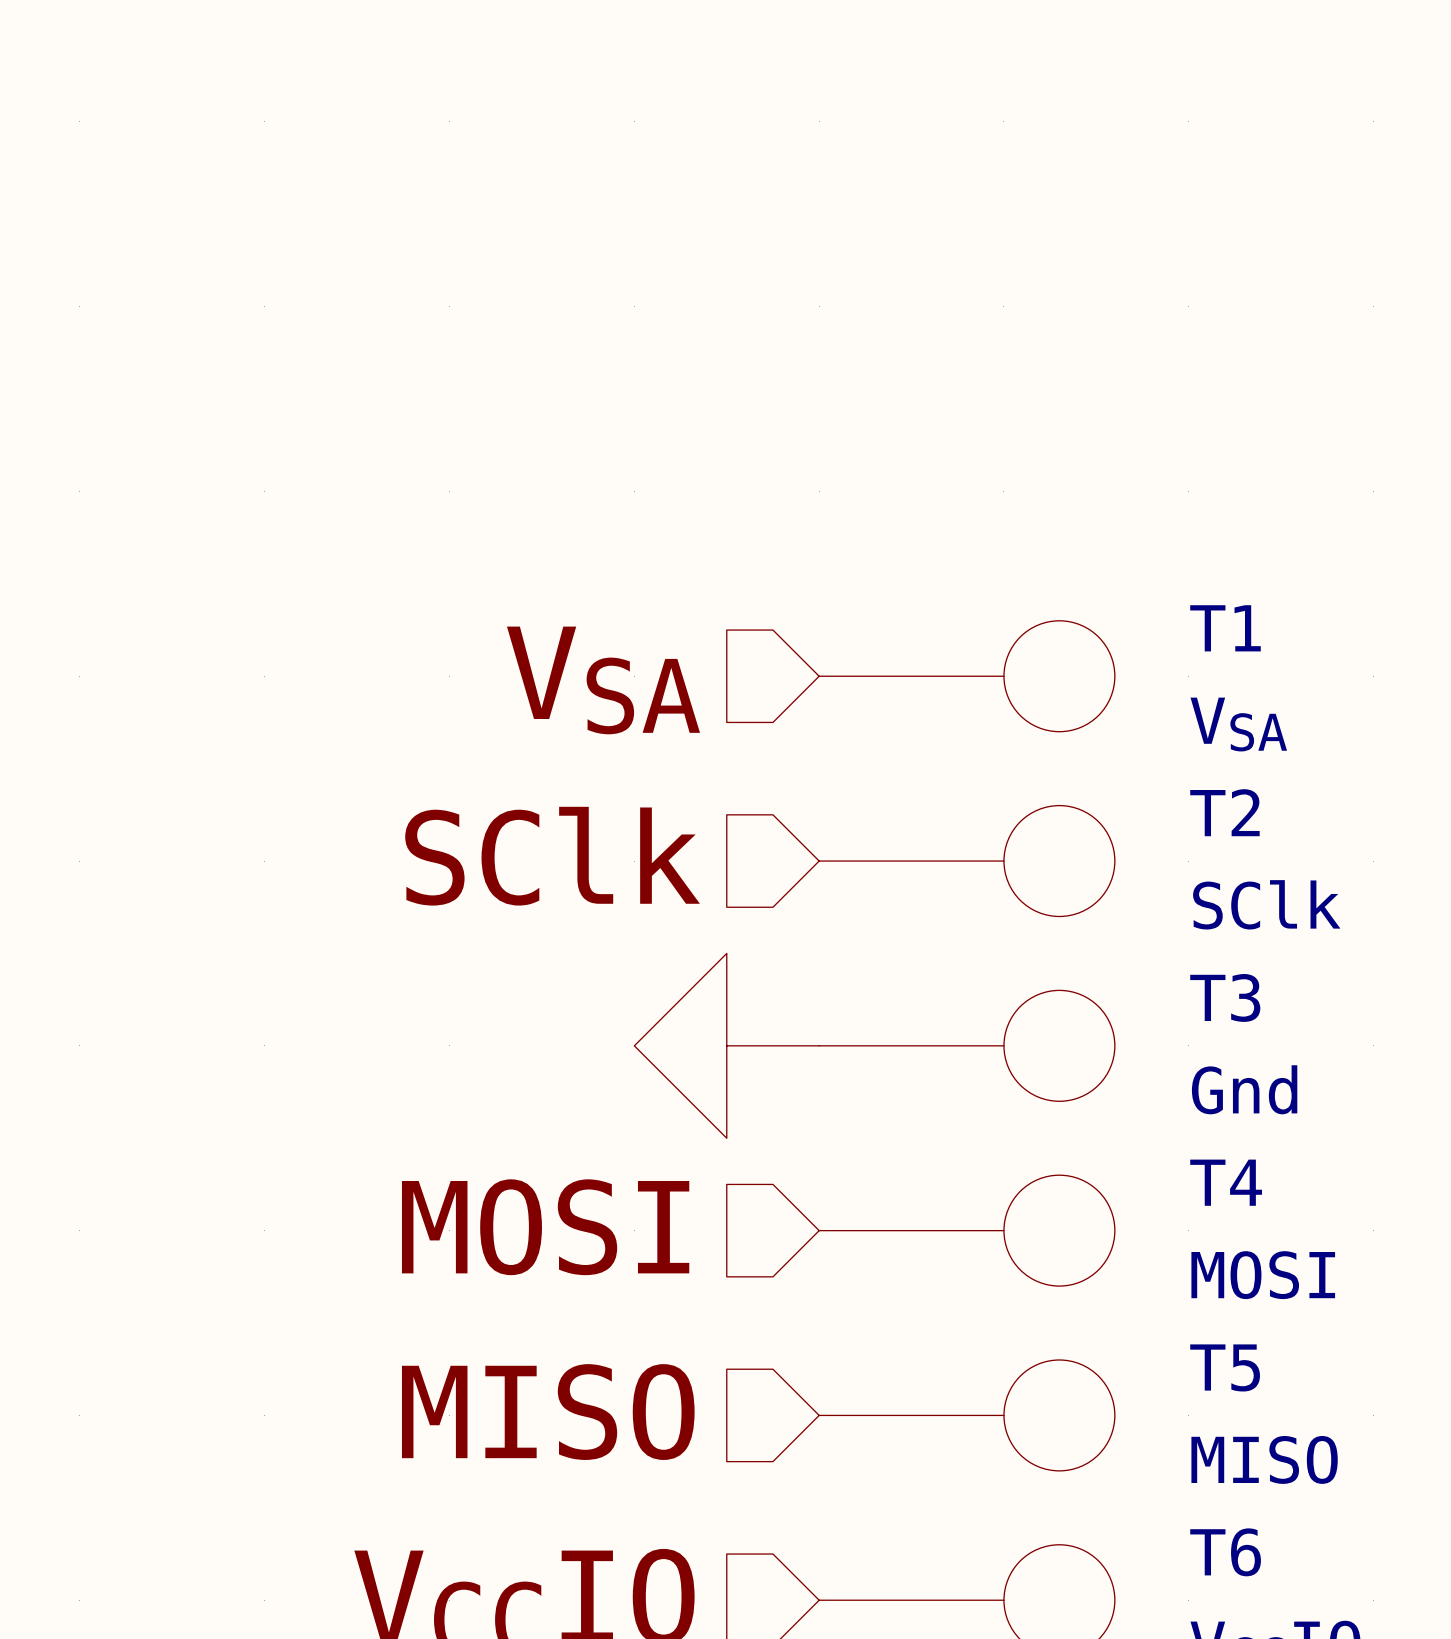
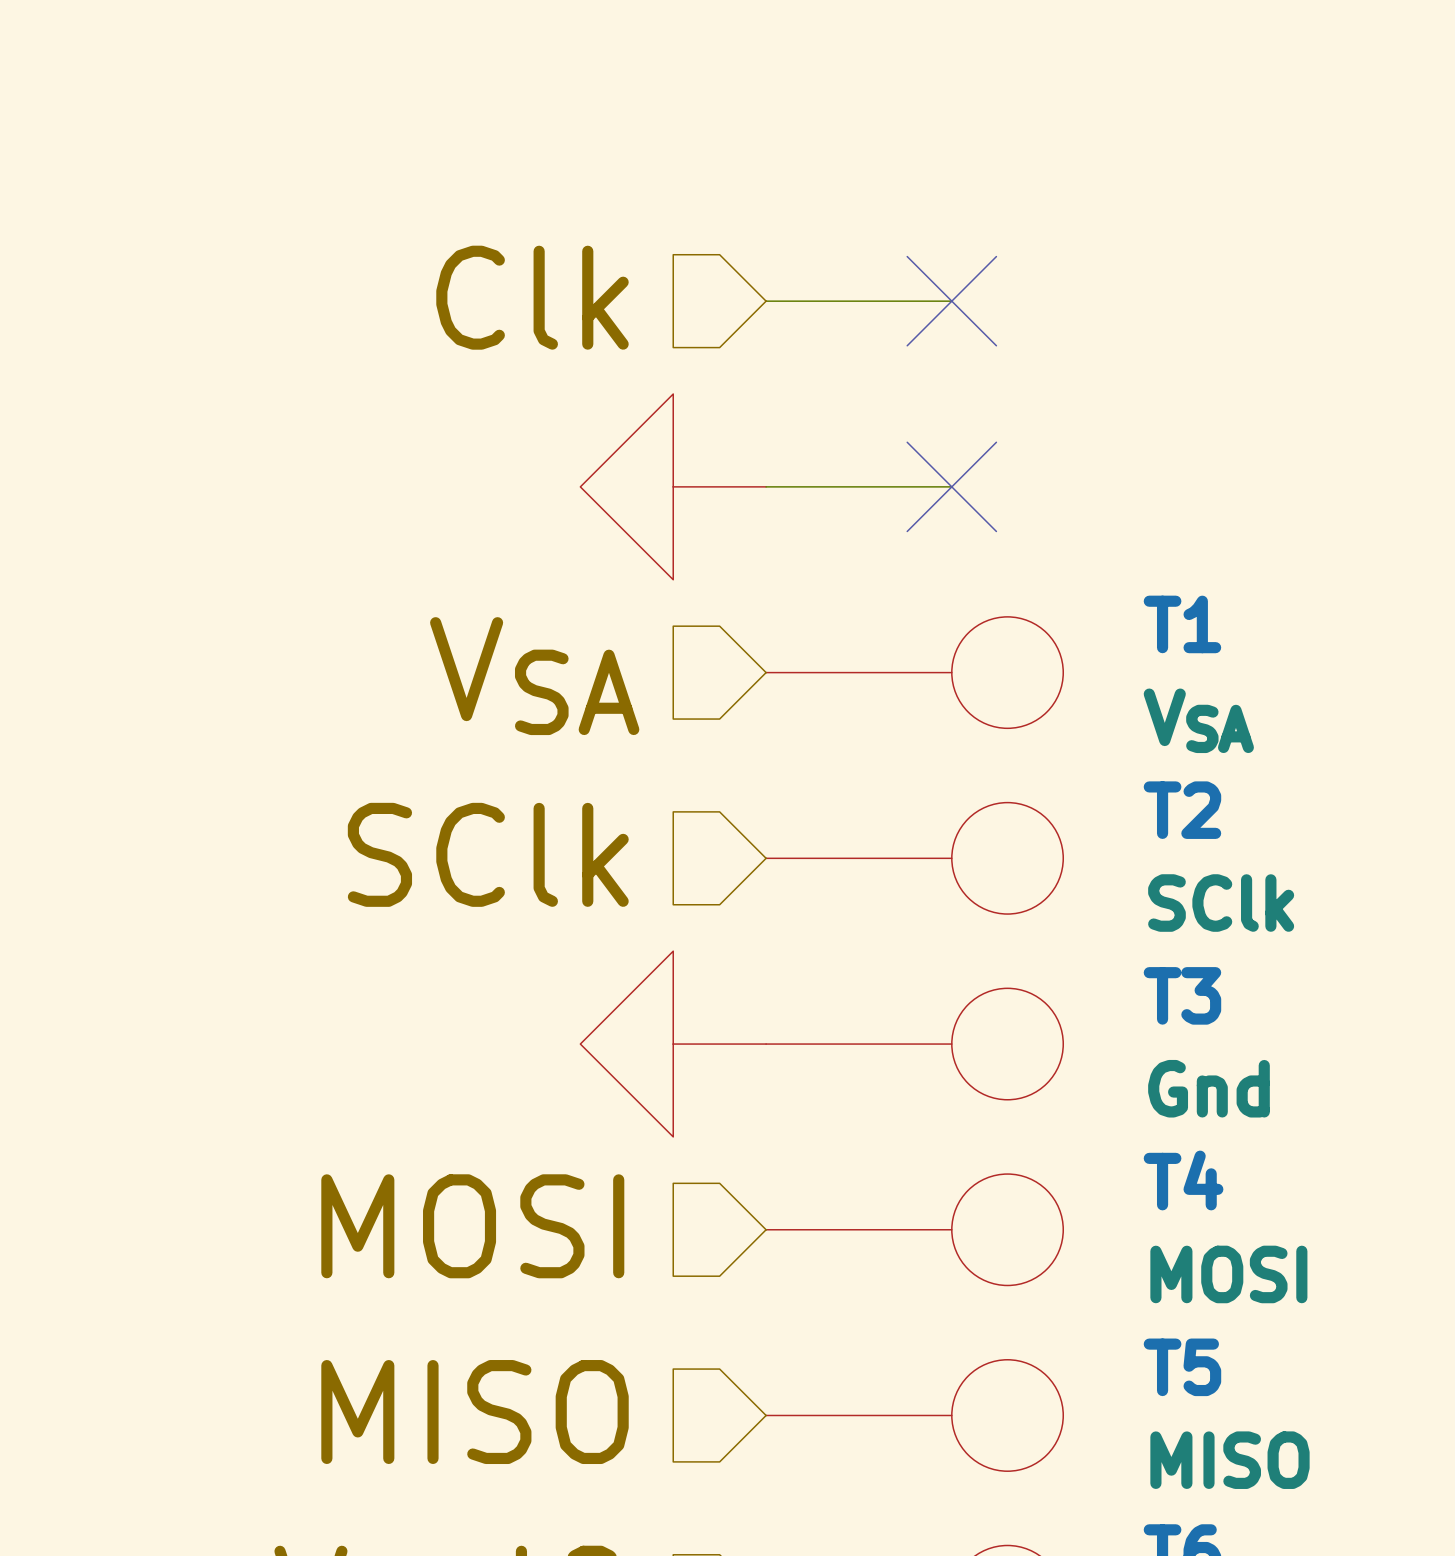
hierarchical label: none -> Clk (532, 297)
wire: none -> (766, 301) (951, 301)
no-connect mark: none -> (951, 301)
power symbol: none -> (673, 486)
wire: none -> (766, 486) (951, 486)
no-connect mark: none -> (951, 486)

